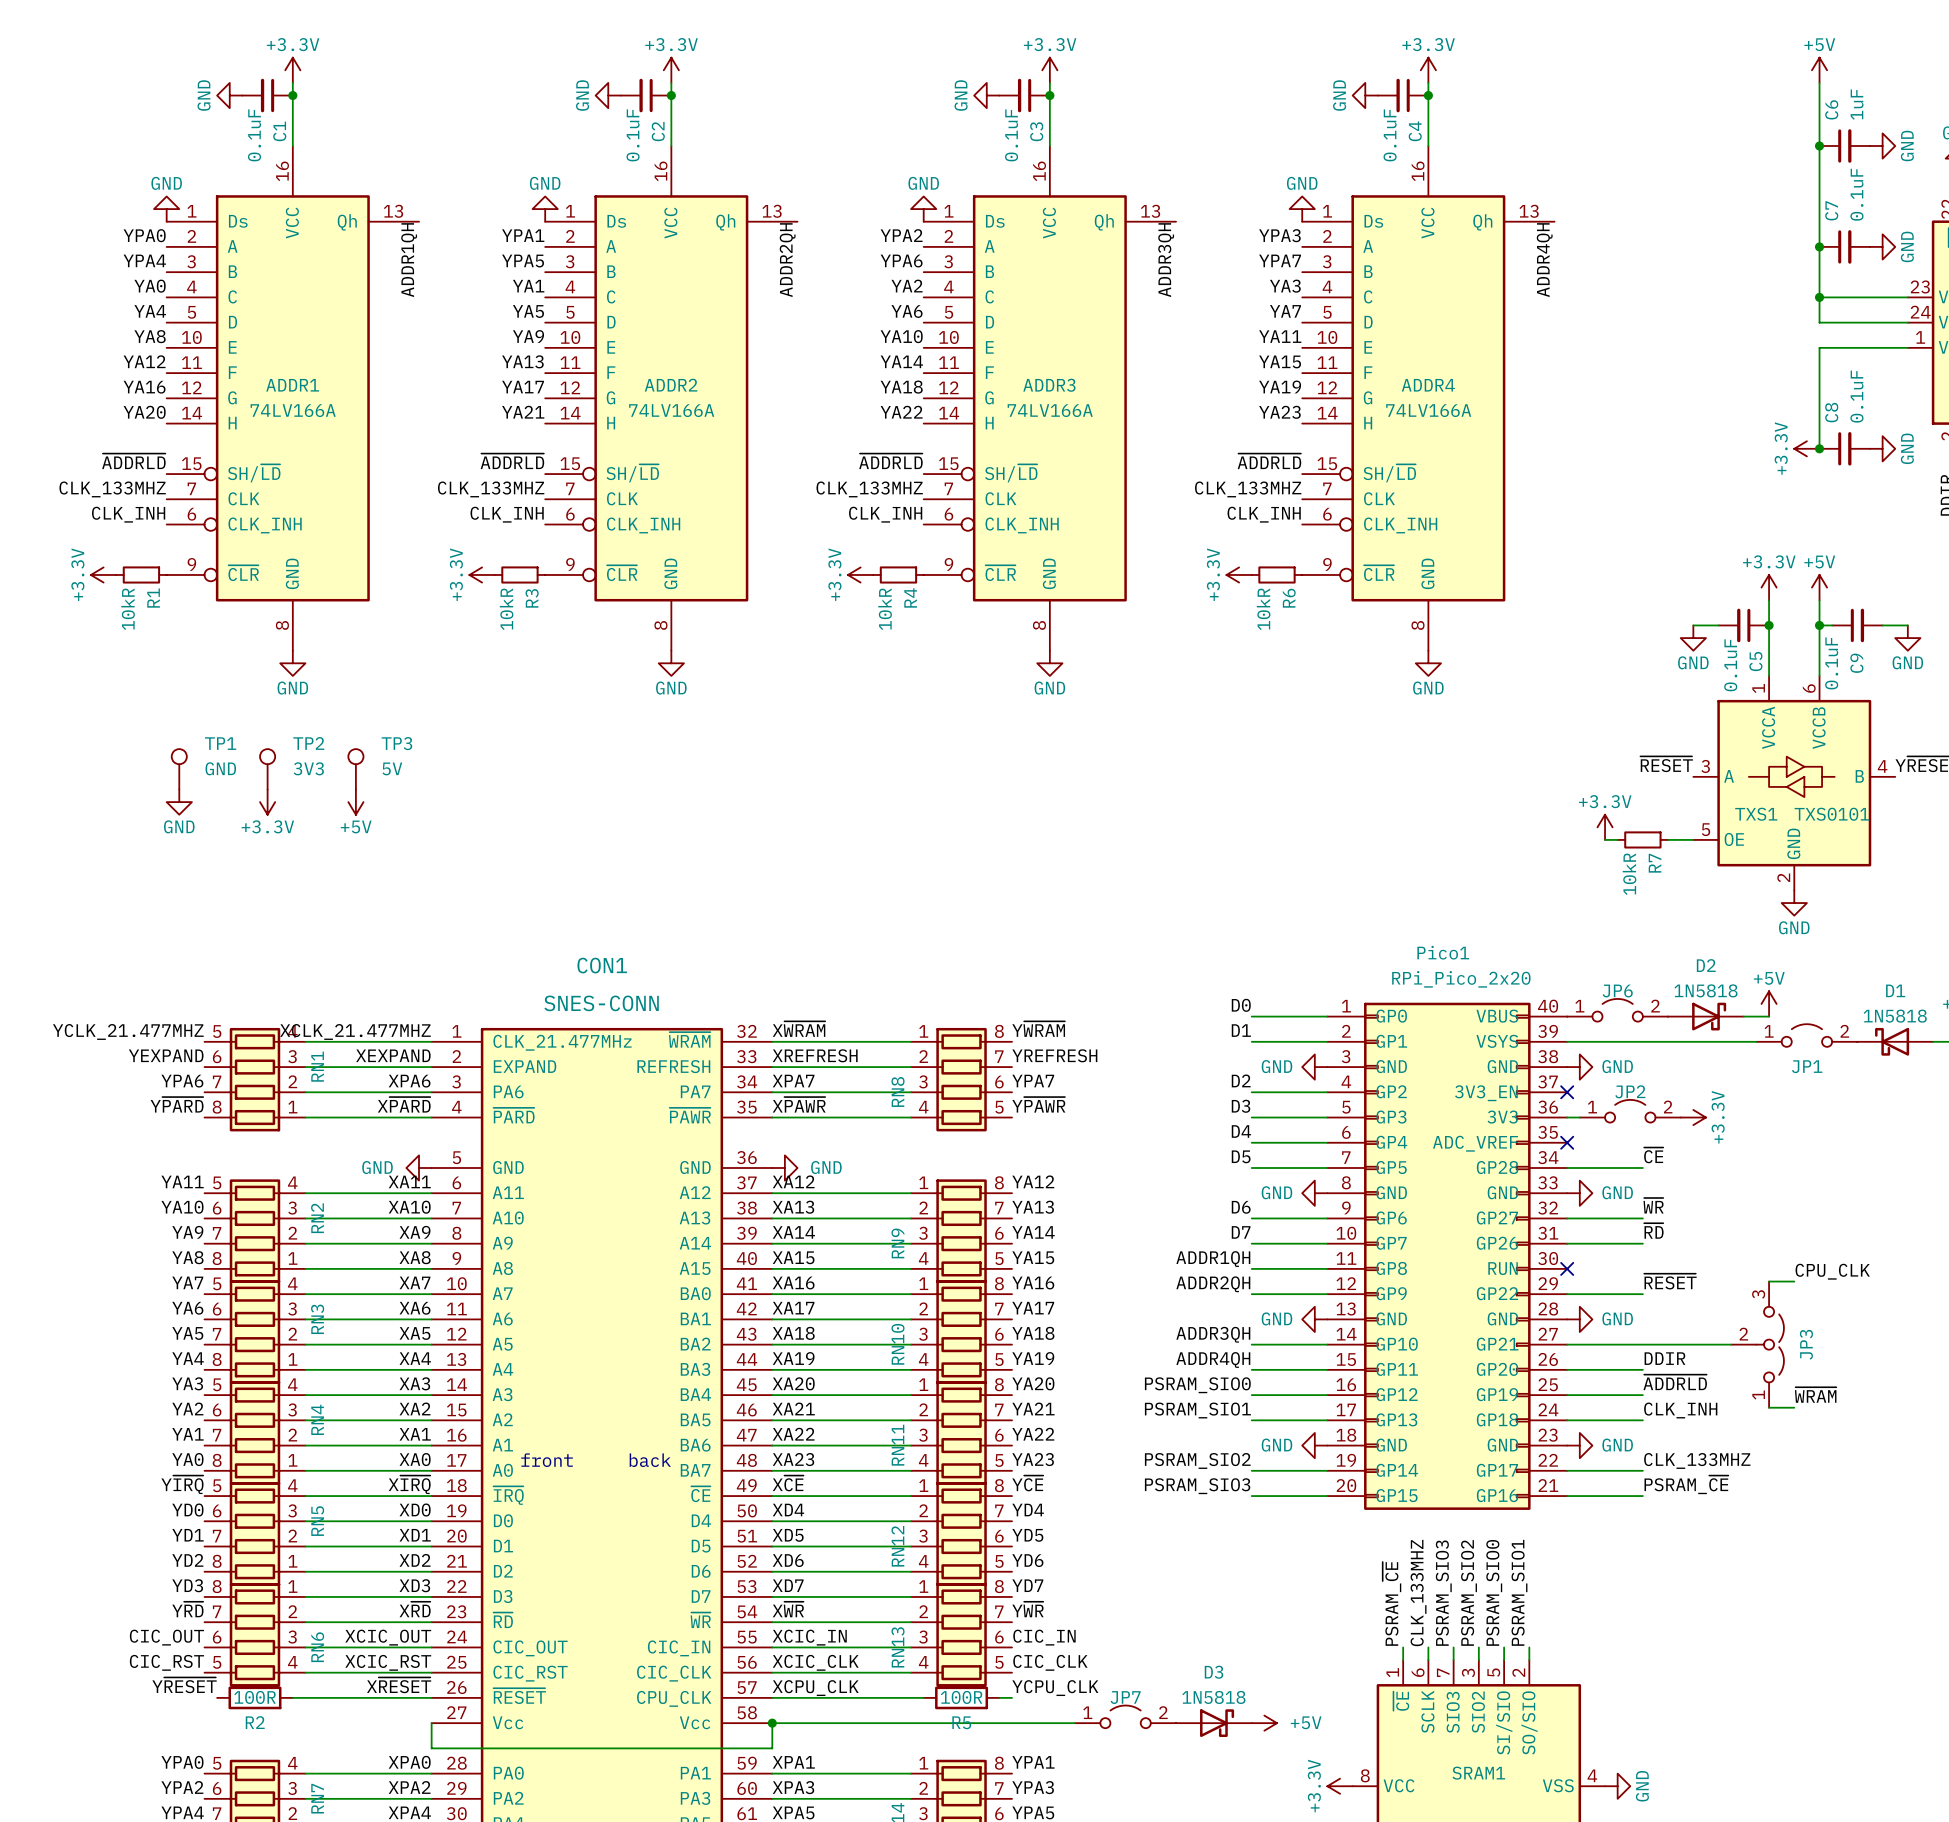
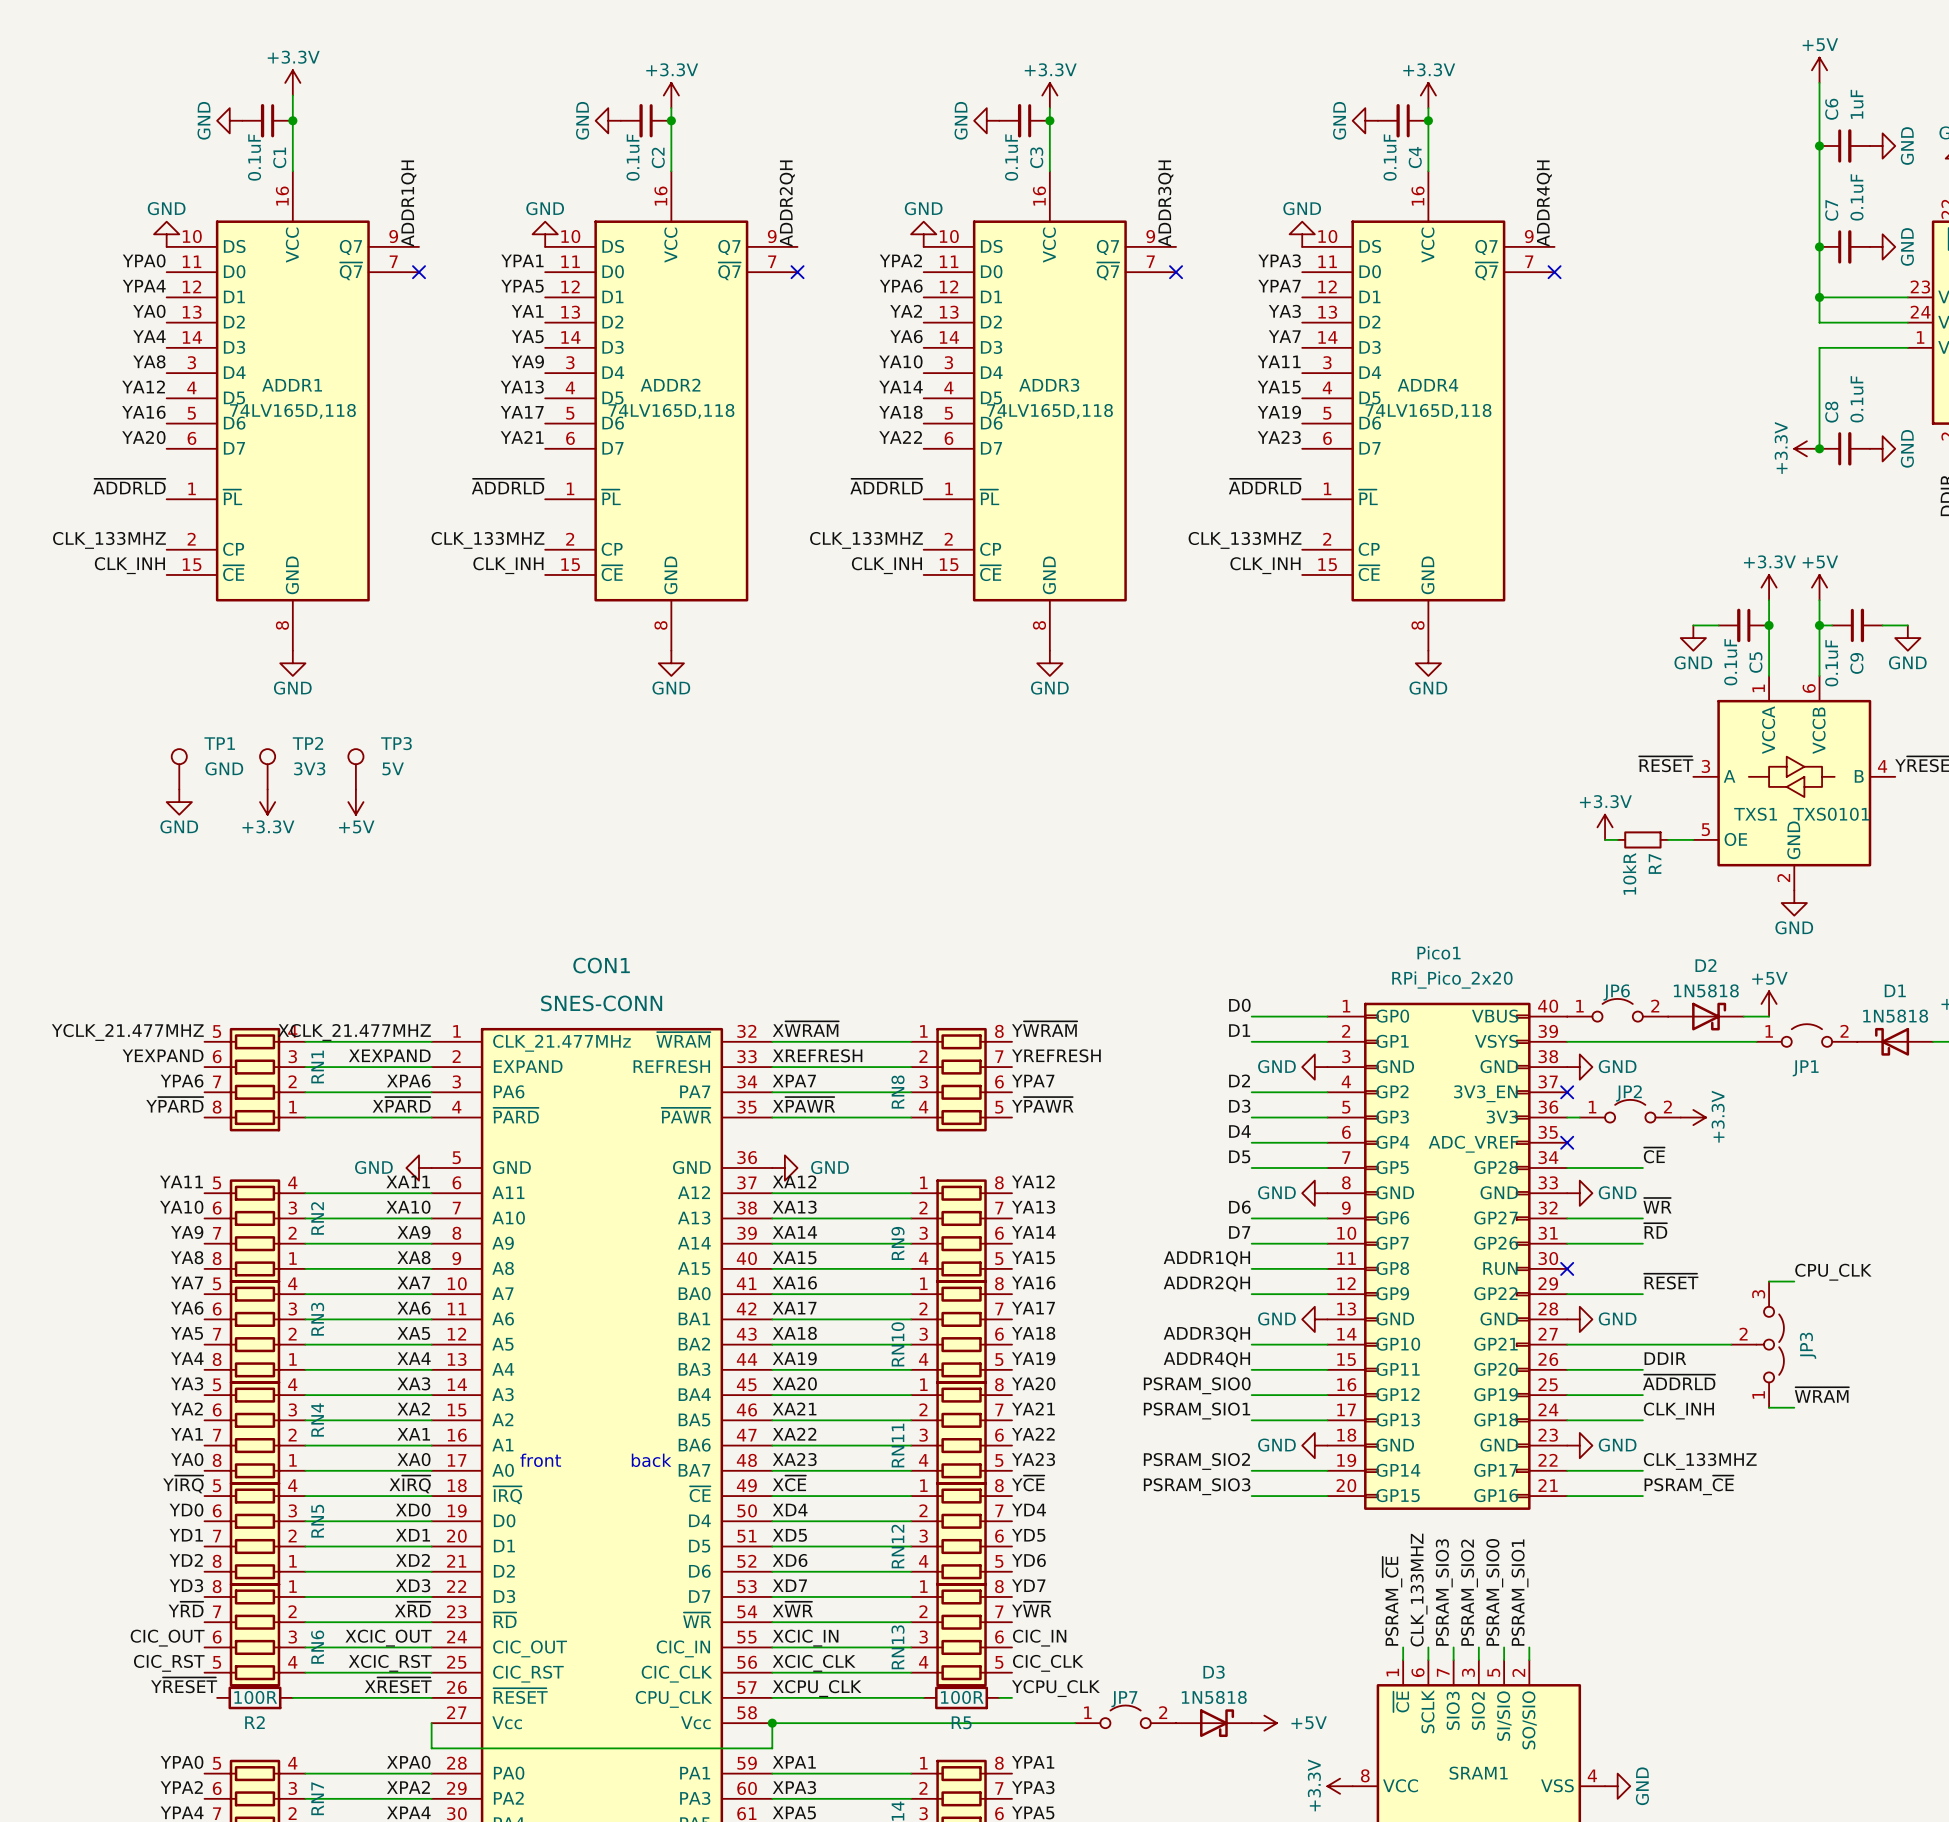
power symbol position: +3.3V (292, 70) -> +3.3V (292, 82)
power symbol position: +3.3V (671, 70) -> +3.3V (671, 95)
power symbol position: +3.3V (1049, 70) -> +3.3V (1049, 95)
power symbol position: +3.3V (1428, 70) -> +3.3V (1428, 95)
power symbol position: GND (229, 95) -> GND (229, 120)
C1 position: (267, 95) -> (267, 120)
junction position: (292, 95) -> (292, 120)
power symbol position: GND (608, 95) -> GND (608, 120)
C2 position: (646, 95) -> (646, 120)
junction position: (671, 95) -> (671, 120)
power symbol position: GND (986, 95) -> GND (986, 120)
C3 position: (1024, 95) -> (1024, 120)
junction position: (1049, 95) -> (1049, 120)
power symbol position: GND (1365, 95) -> GND (1365, 120)
C4 position: (1403, 95) -> (1403, 120)
junction position: (1428, 95) -> (1428, 120)
ADDR1 symbol: [166, 146, 420, 651] -> [166, 171, 420, 651]
ADDR2 symbol: [545, 146, 798, 651] -> [545, 171, 798, 651]
ADDR3 symbol: [923, 146, 1177, 651] -> [923, 171, 1177, 651]
ADDR4 symbol: [1302, 146, 1555, 651] -> [1302, 171, 1555, 651]
power symbol position: GND (166, 209) -> GND (166, 234)
power symbol position: GND (545, 209) -> GND (545, 234)
power symbol position: GND (923, 209) -> GND (923, 234)
power symbol position: GND (1302, 209) -> GND (1302, 234)
label: YPA0 (144, 235) -> none
label: YPA1 (523, 235) -> none
label: YPA2 (901, 235) -> none
label: YPA3 (1279, 235) -> none
label: YPA4 (144, 260) -> YPA0 (144, 260)
label position: ADDR1QH (409, 260) -> ADDR1QH (408, 203)
label position: ADDR2QH (787, 260) -> ADDR2QH (787, 203)
label position: ADDR3QH (1166, 260) -> ADDR3QH (1165, 203)
label: YPA7 (1280, 260) -> YPA3 (1279, 260)
label position: ADDR4QH (1544, 260) -> ADDR4QH (1544, 203)
label: YPA5 (523, 261) -> YPA1 (522, 260)
label: YPA6 (901, 261) -> YPA2 (900, 260)
no-connect mark: none -> (419, 272)
no-connect mark: none -> (797, 272)
no-connect mark: none -> (1176, 272)
no-connect mark: none -> (1554, 272)
label: YA0 (150, 286) -> YPA4 (144, 286)
label: YA1 (528, 286) -> YPA5 (522, 286)
label: YA2 (907, 286) -> YPA6 (901, 286)
label: YA3 (1285, 286) -> YPA7 (1279, 286)
label: YA4 (150, 311) -> YA0 (149, 311)
label: YA5 (528, 311) -> YA1 (527, 311)
label: YA6 (907, 311) -> YA2 (906, 311)
label: YA7 (1285, 311) -> YA3 (1284, 311)
label: YA8 (150, 336) -> YA4 (149, 336)
label: YA9 (528, 336) -> YA5 (527, 336)
label: YA10 (901, 336) -> YA6 (906, 336)
label: YA11 (1280, 336) -> YA7 (1284, 336)
label: YA12 (144, 361) -> YA8 (149, 361)
label: YA13 (522, 361) -> YA9 (527, 361)
label: YA14 (901, 361) -> YA10 (900, 361)
label: YA15 (1280, 361) -> YA11 (1279, 361)
label: YA19 (1280, 386) -> YA15 (1279, 387)
label: YA16 (144, 387) -> YA12 (143, 386)
label: YA17 (523, 387) -> YA13 (522, 387)
label: YA18 (901, 387) -> YA14 (900, 387)
ADDR1 value: 74LV166A (293, 410) -> 74LV165D,118 (292, 411)
ADDR2 value: 74LV166A (671, 410) -> 74LV165D,118 (671, 411)
ADDR3 value: 74LV166A (1050, 410) -> 74LV165D,118 (1049, 411)
ADDR4 value: 74LV166A (1428, 410) -> 74LV165D,118 (1428, 411)
label: YA20 (144, 412) -> YA16 (143, 412)
label: YA21 (523, 412) -> YA17 (522, 412)
label: YA22 (901, 412) -> YA18 (900, 412)
label: YA23 (1279, 412) -> YA19 (1279, 412)
label: none -> YA20 (143, 437)
label: none -> YA21 (522, 437)
label: none -> YA22 (900, 437)
label: none -> YA23 (1279, 437)
label: ~{ADDRLD} (133, 461) -> none
label: ~{ADDRLD} (512, 461) -> none
label: ~{ADDRLD} (890, 461) -> none
label: ~{ADDRLD} (1269, 461) -> none
label: CLK_133MHZ (112, 489) -> ~{ADDRLD} (129, 486)
label: CLK_133MHZ (491, 489) -> ~{ADDRLD} (507, 486)
label: CLK_133MHZ (869, 489) -> ~{ADDRLD} (886, 486)
label: CLK_133MHZ (1248, 489) -> ~{ADDRLD} (1265, 486)
label position: CLK_INH (128, 514) -> CLK_INH (129, 565)
label position: CLK_INH (507, 514) -> CLK_INH (508, 565)
label position: CLK_INH (885, 514) -> CLK_INH (886, 565)
label position: CLK_INH (1264, 514) -> CLK_INH (1265, 565)
label: none -> CLK_133MHZ (109, 540)
label: none -> CLK_133MHZ (488, 540)
label: none -> CLK_133MHZ (866, 540)
label: none -> CLK_133MHZ (1245, 540)
power symbol: +3.3V (103, 574) -> none
R1: 10kR (141, 574) -> none
power symbol: +3.3V (482, 574) -> none
R3: 10kR (519, 574) -> none
power symbol: +3.3V (860, 574) -> none
R4: 10kR (898, 574) -> none
power symbol: +3.3V (1239, 574) -> none
R6: 10kR (1276, 574) -> none

